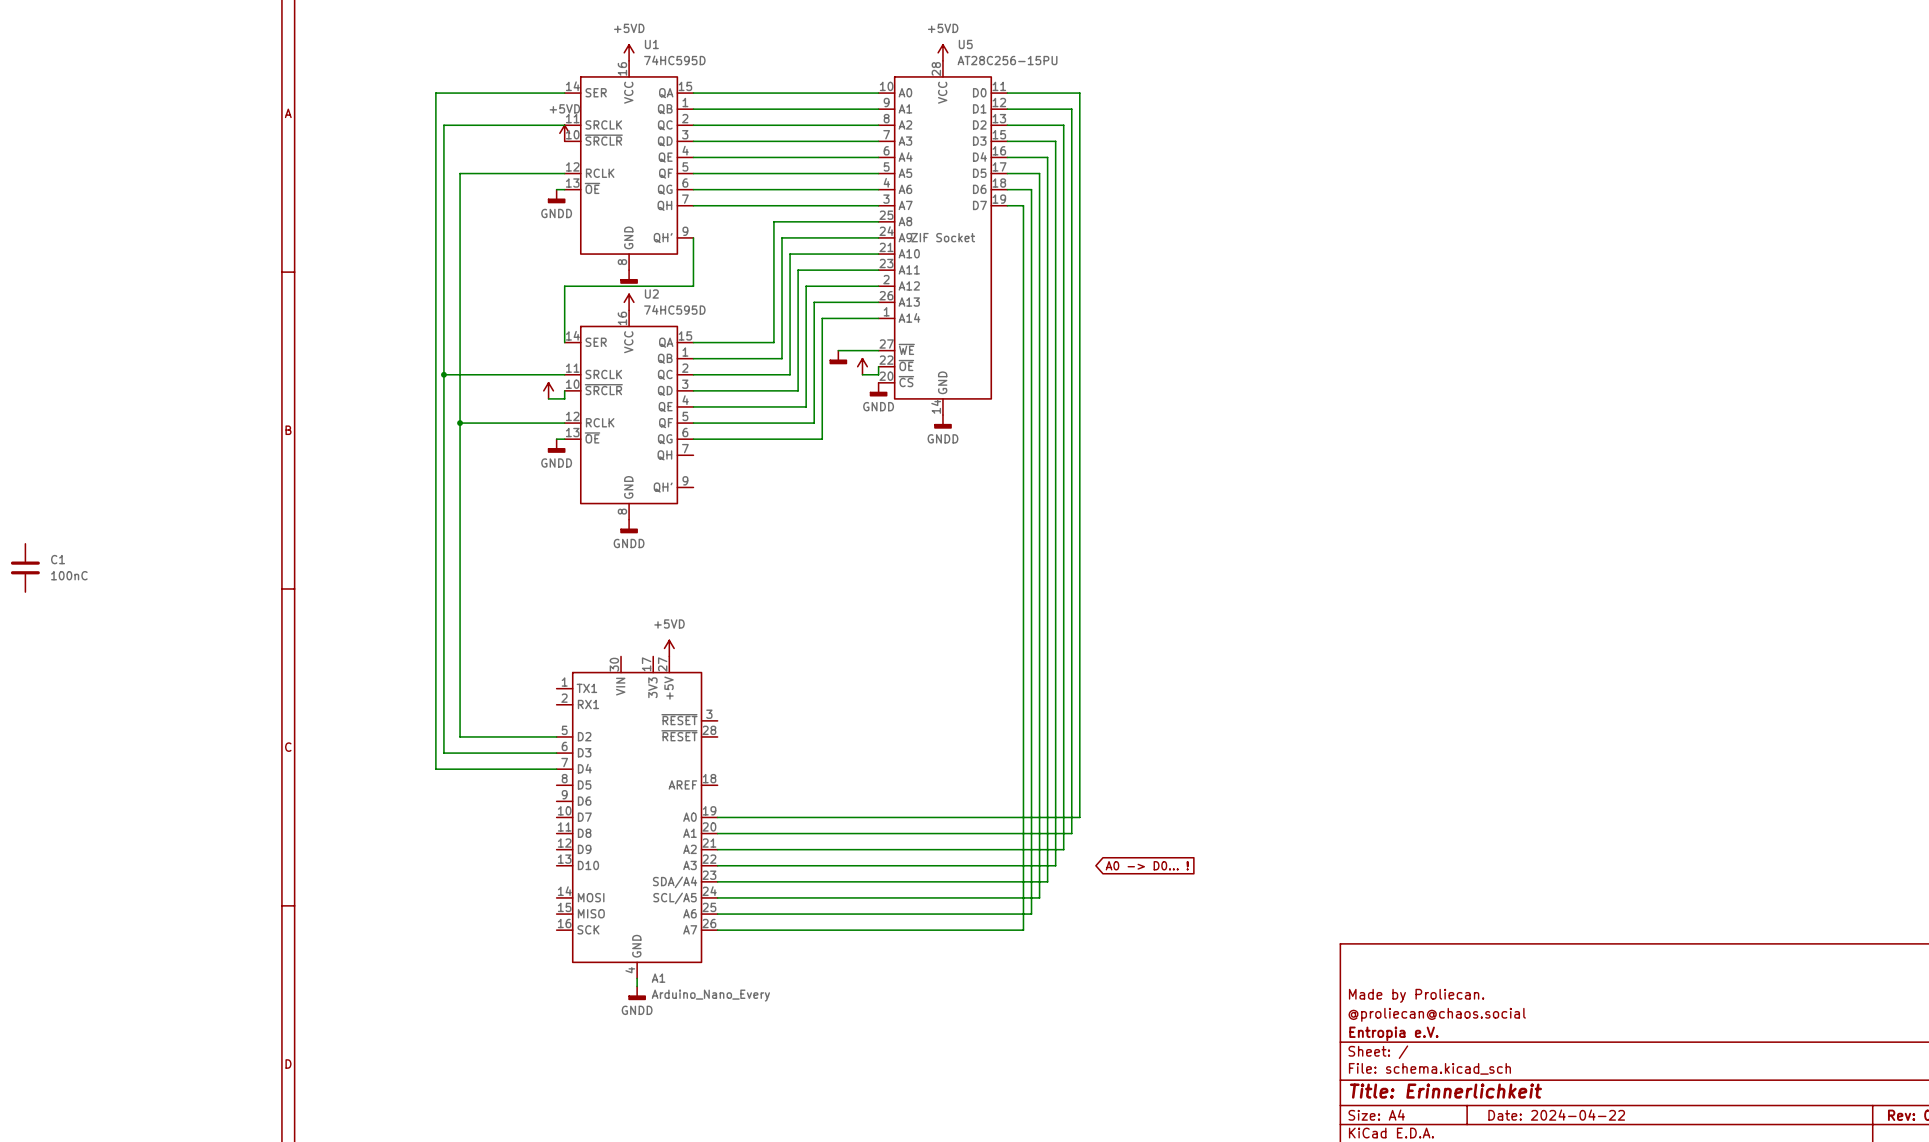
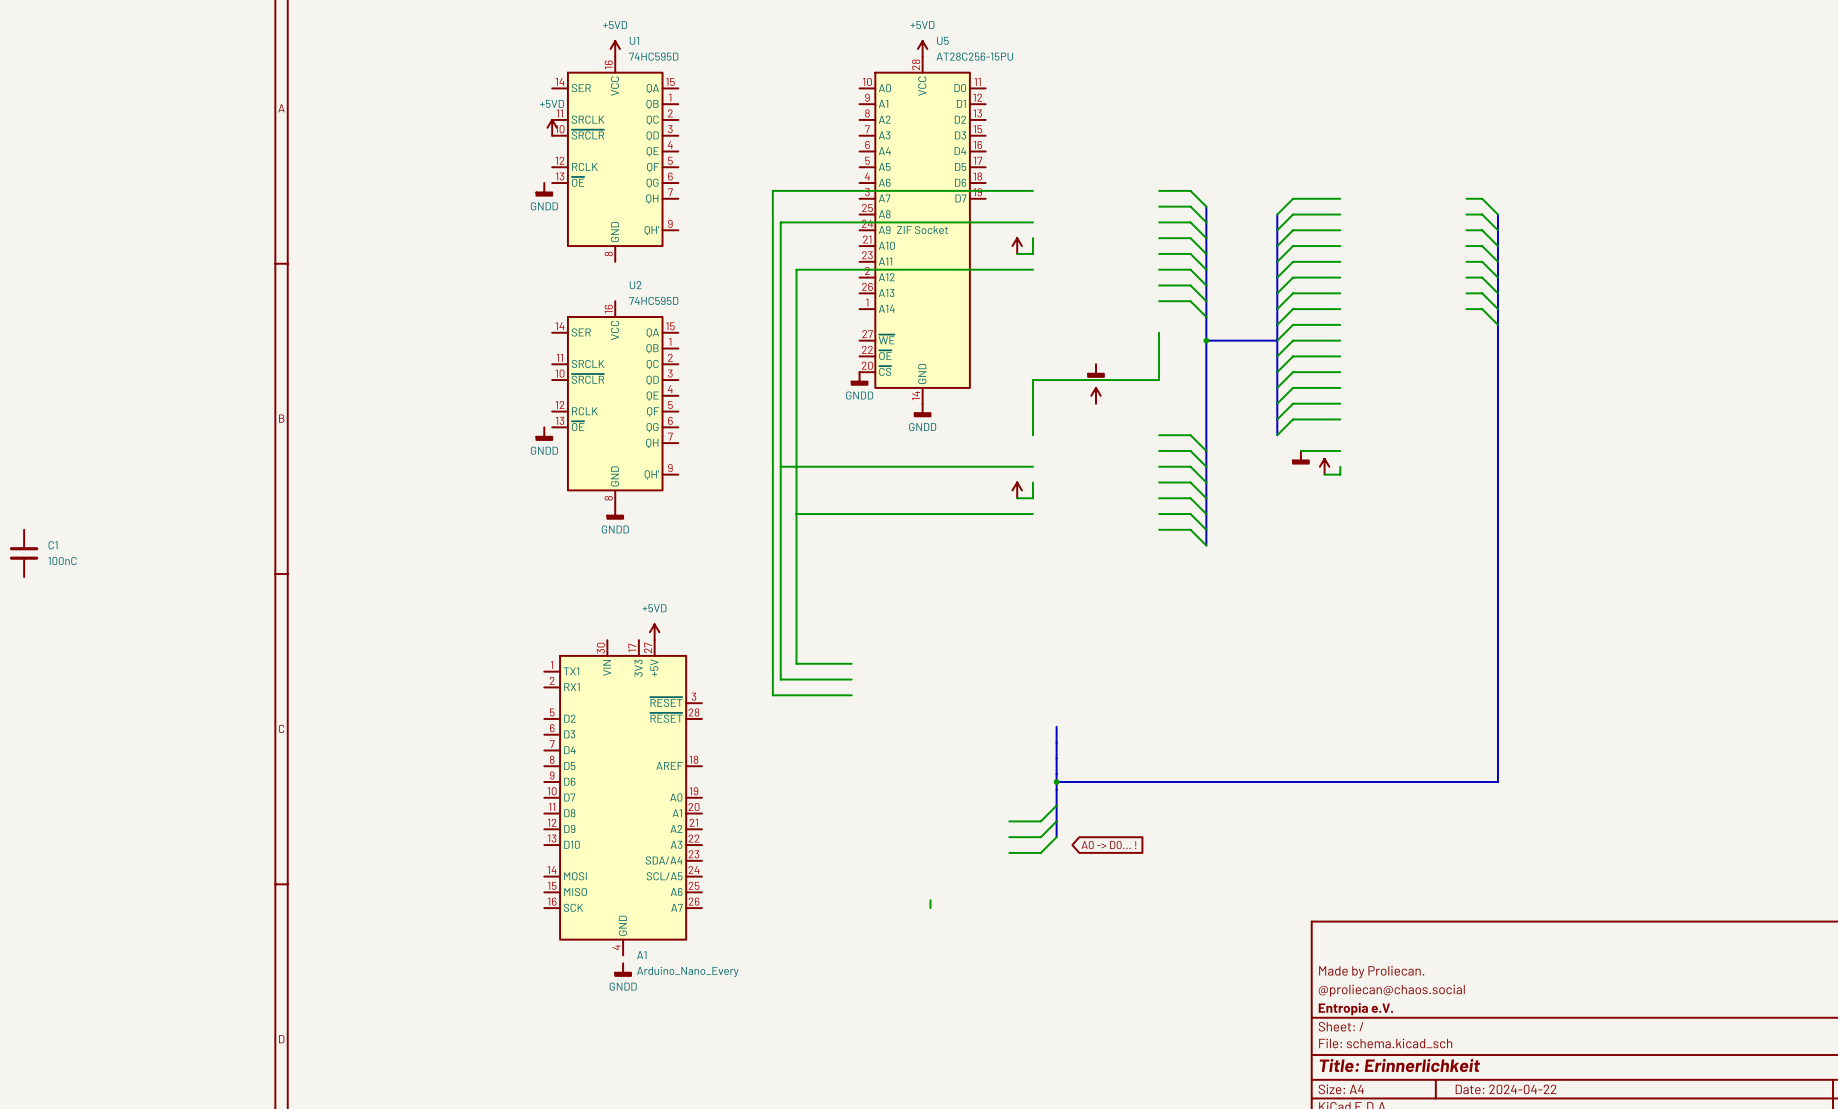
wire: (564, 93) (435, 93) (435, 769) (556, 769) -> none
wire: (693, 93) (878, 93) -> none
wire: (1007, 93) (1079, 93) (1079, 817) (717, 817) -> none
wire: (693, 109) (878, 109) -> none
wire: (1007, 109) (1071, 109) (1071, 833) (717, 833) -> none
wire: (564, 125) (443, 125) (443, 753) (556, 753) -> none
wire: (693, 125) (878, 125) -> none
wire: (1007, 125) (1063, 125) (1063, 849) (717, 849) -> none
wire: (693, 141) (878, 141) -> none
wire: (1007, 141) (1055, 141) (1055, 245) -> none
wire: (693, 157) (878, 157) -> none
wire: (1007, 157) (1047, 157) (1047, 881) (717, 881) -> none
wire: (564, 173) (460, 173) (460, 736) (556, 736) -> none
wire: (693, 173) (878, 173) -> none
wire: (1007, 173) (1039, 173) (1039, 897) (717, 897) -> none
wire: (556, 189) (564, 189) -> none
wire: (693, 189) (878, 189) -> none
wire: (1007, 189) (1031, 189) (1031, 914) (717, 914) -> none
wire: none -> (1159, 190) (1190, 190) (1206, 206)
wire: (693, 205) (878, 205) -> none
wire: (1007, 205) (1023, 205) (1023, 930) (717, 930) -> none
wire: none -> (1340, 198) (1293, 198) (1277, 214)
wire: none -> (1466, 198) (1482, 198) (1497, 214)
wire: none -> (1159, 206) (1190, 206) (1206, 222)
bus: none -> (1206, 206) (1206, 545)
wire: (878, 221) (773, 221) (773, 342) (693, 342) -> none
bus: none -> (1277, 214) (1277, 435)
wire: none -> (1340, 214) (1293, 214) (1277, 230)
wire: none -> (1466, 214) (1482, 214) (1497, 230)
bus: none -> (1497, 214) (1497, 782) (1056, 782)
wire: none -> (1159, 222) (1190, 222) (1206, 238)
wire: (693, 237) (693, 286) (564, 286) (564, 342) -> none
wire: (878, 237) (782, 237) (782, 358) (693, 358) -> none
wire: none -> (1340, 230) (1293, 230) (1277, 246)
wire: none -> (1466, 230) (1482, 230) (1497, 246)
wire: none -> (1159, 238) (1190, 238) (1206, 253)
wire: (790, 254) (878, 254) -> (772, 246) (772, 190) (1032, 190)
power symbol: none -> (1017, 246)
wire: none -> (1340, 246) (1293, 246) (1277, 261)
wire: none -> (1466, 246) (1482, 246) (1497, 261)
wire: (1055, 262) (1055, 390) -> (1032, 253) (1017, 253)
wire: none -> (1159, 253) (1190, 253) (1206, 269)
wire: (798, 270) (878, 270) -> (780, 261) (780, 222) (1032, 222)
wire: none -> (1340, 261) (1293, 261) (1277, 277)
wire: none -> (1466, 261) (1482, 261) (1497, 277)
power symbol: (629, 276) -> none
wire: none -> (1159, 269) (1190, 269) (1206, 285)
wire: (878, 286) (806, 286) (806, 406) (693, 406) -> none
wire: none -> (1340, 277) (1293, 277) (1277, 293)
wire: none -> (1466, 277) (1482, 277) (1497, 293)
wire: none -> (1159, 285) (1190, 285) (1206, 301)
power symbol: (629, 302) -> none
wire: (814, 302) (878, 302) -> (796, 293) (796, 269) (1032, 269)
wire: none -> (1340, 293) (1293, 293) (1277, 309)
wire: none -> (1466, 293) (1482, 293) (1497, 309)
wire: none -> (1159, 301) (1190, 301) (1206, 316)
wire: (878, 318) (822, 318) (822, 439) (693, 439) -> none
wire: none -> (1340, 309) (1293, 309) (1277, 324)
wire: none -> (1466, 309) (1482, 309) (1497, 324)
wire: none -> (1340, 324) (1293, 324) (1277, 340)
wire: none -> (1159, 332) (1159, 380) (1032, 380)
wire: (838, 350) (878, 350) -> none
bus: none -> (1206, 340) (1277, 340)
junction: none -> (1206, 340)
wire: none -> (1340, 340) (1293, 340) (1277, 356)
power symbol: (838, 357) -> none
power symbol: (862, 366) -> none
wire: (878, 366) (878, 374) (862, 374) -> none
wire: none -> (1340, 356) (1293, 356) (1277, 372)
wire: (443, 374) (564, 374) -> none
junction: (443, 374) -> none
wire: (693, 374) (790, 374) -> (851, 695) (772, 695) (772, 364)
power symbol: none -> (1096, 370)
wire: none -> (1340, 372) (1293, 372) (1277, 387)
power symbol: (548, 390) -> none
wire: (564, 390) (564, 398) (548, 398) -> none
wire: (693, 390) (798, 390) -> (851, 679) (780, 679) (780, 380)
wire: none -> (1340, 387) (1293, 387) (1277, 403)
power symbol: none -> (1096, 395)
wire: none -> (1340, 403) (1293, 403) (1277, 419)
wire: (460, 423) (564, 423) -> none
junction: (460, 423) -> none
wire: (693, 423) (814, 423) -> (851, 663) (796, 663) (796, 411)
wire: none -> (1340, 419) (1293, 419) (1277, 435)
wire: (556, 439) (564, 439) -> none
wire: (1055, 447) (1055, 495) -> none
wire: none -> (1159, 435) (1190, 435) (1206, 450)
wire: none -> (1159, 450) (1190, 450) (1206, 466)
wire: none -> (1300, 450) (1340, 450)
power symbol: none -> (1300, 457)
wire: none -> (780, 466) (1032, 466)
wire: none -> (1159, 466) (1190, 466) (1206, 482)
power symbol: none -> (1324, 466)
wire: none -> (1340, 466) (1340, 474) (1324, 474)
wire: none -> (1159, 482) (1190, 482) (1206, 498)
power symbol: none -> (1017, 490)
wire: (1055, 511) (1055, 865) (717, 865) -> (1032, 498) (1017, 498)
wire: none -> (1159, 498) (1190, 498) (1206, 514)
wire: none -> (796, 514) (1032, 514)
wire: none -> (1159, 514) (1190, 514) (1206, 529)
wire: none -> (1159, 529) (1190, 529) (1206, 545)
bus: none -> (1056, 726) (1056, 837)
junction: none -> (1056, 782)
wire: none -> (1056, 805) (1040, 821) (1009, 821)
wire: none -> (1056, 821) (1040, 837) (1009, 837)
wire: none -> (1056, 837) (1040, 852) (1009, 852)
wire: none -> (930, 900) (930, 908)
wire: (637, 978) (637, 986) -> none

